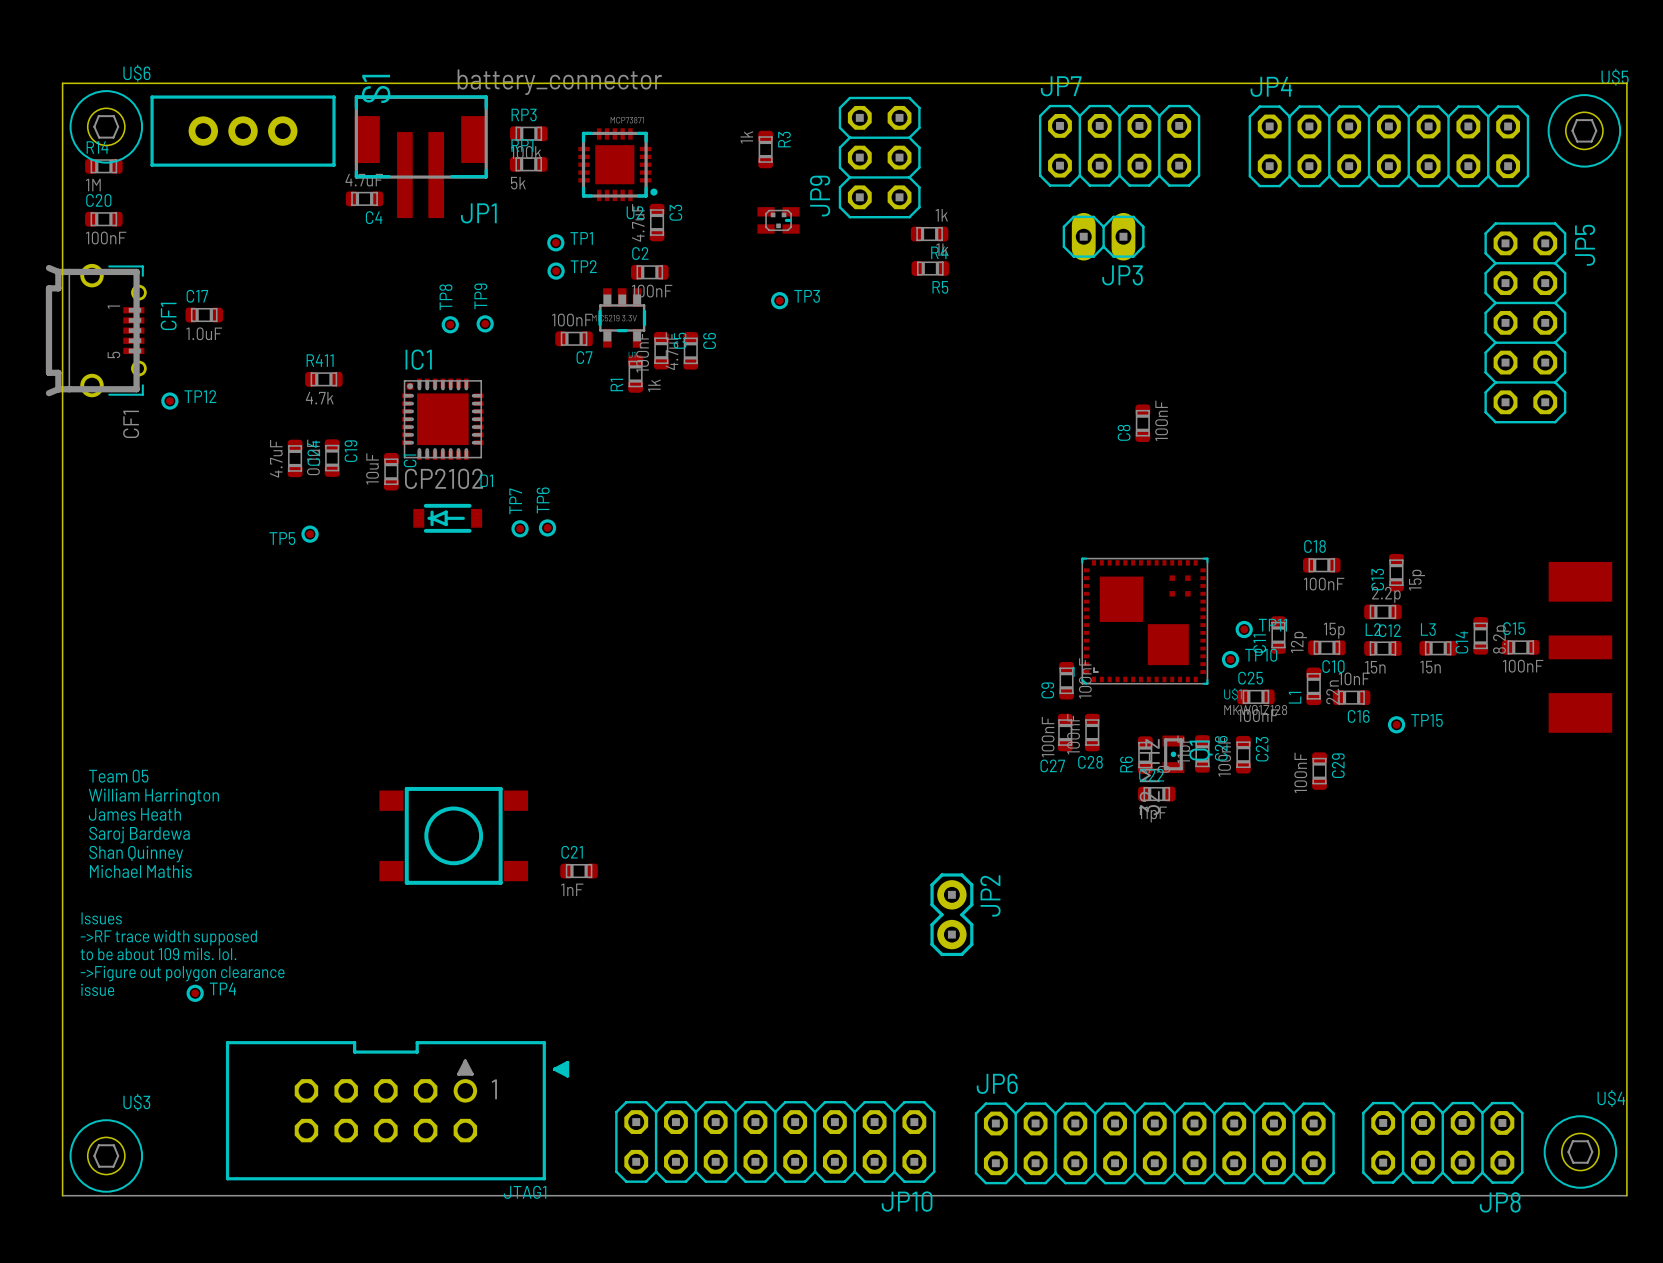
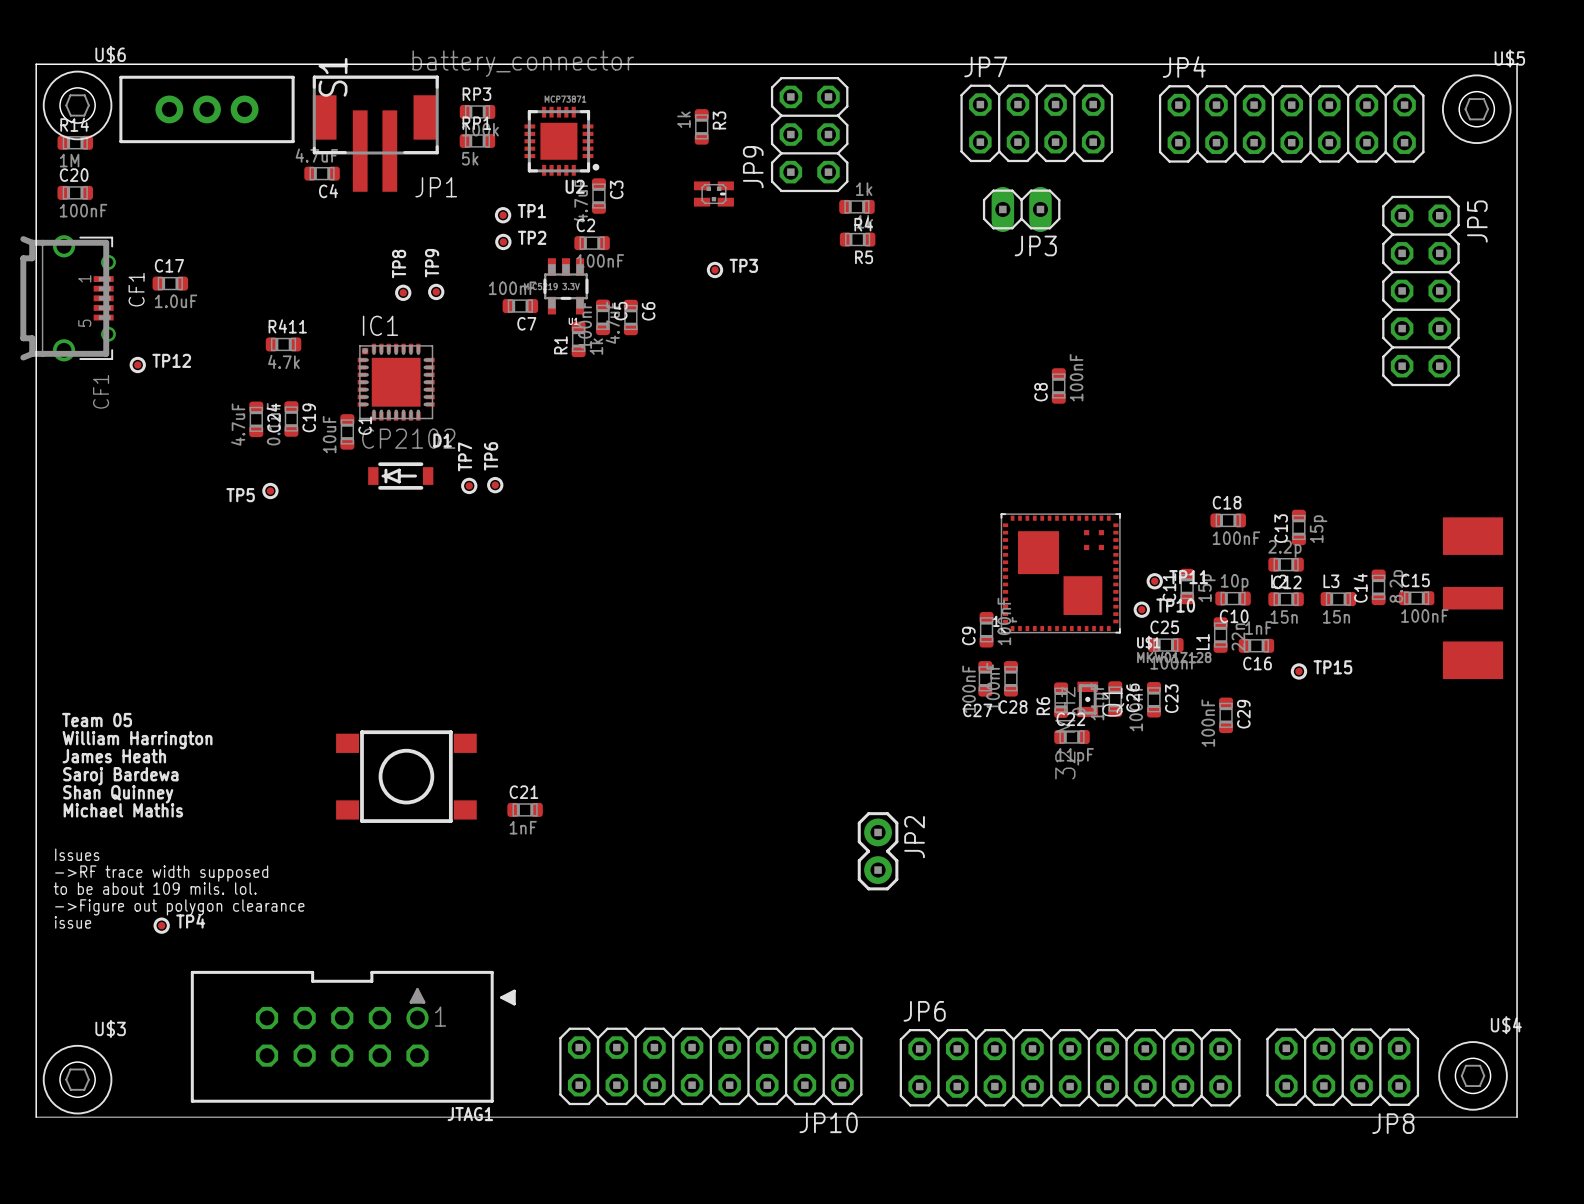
C10 value: 15p (1334, 630) -> 10p (1234, 582)
C11 value: 12p (1298, 642) -> 15p (1206, 588)
C16 value: 10nF (1354, 678) -> 1nF (1258, 628)

